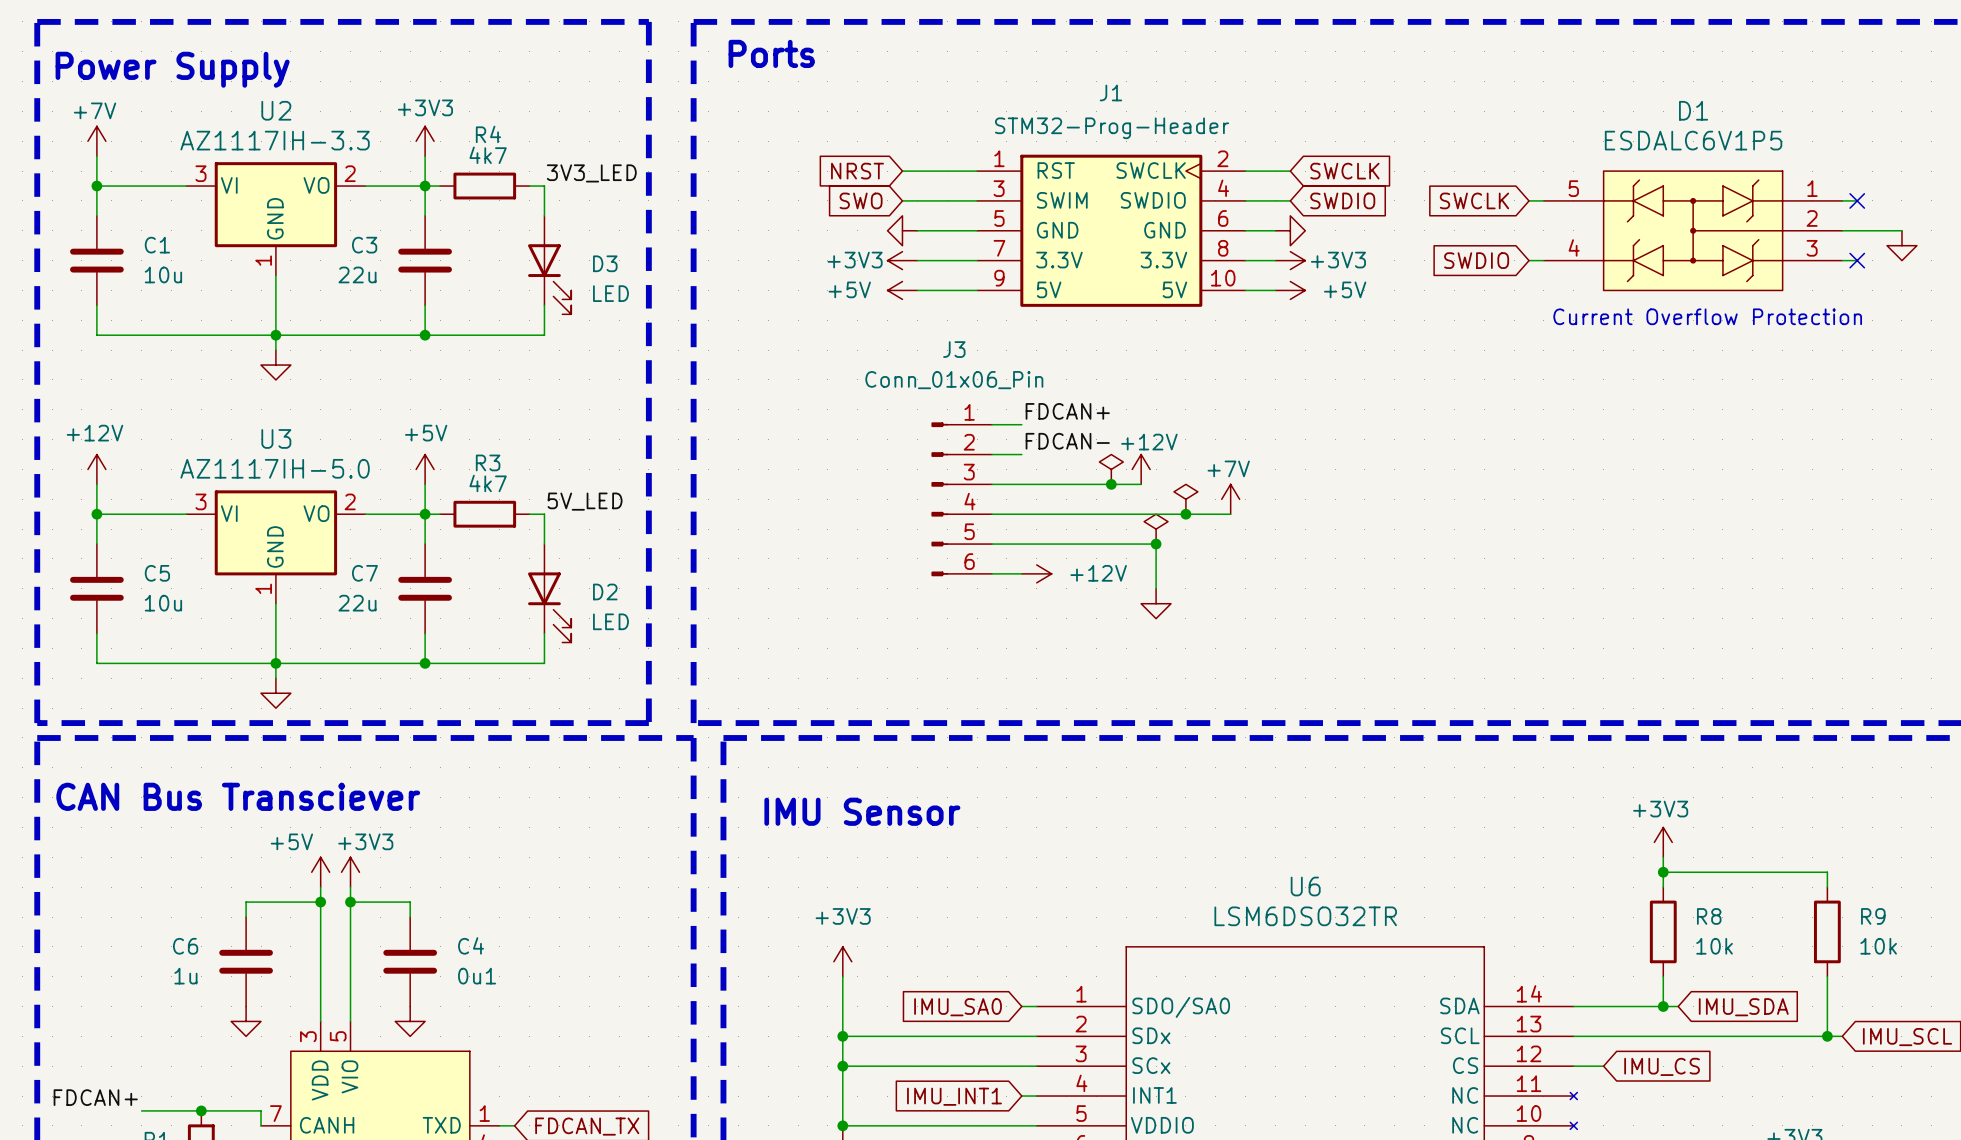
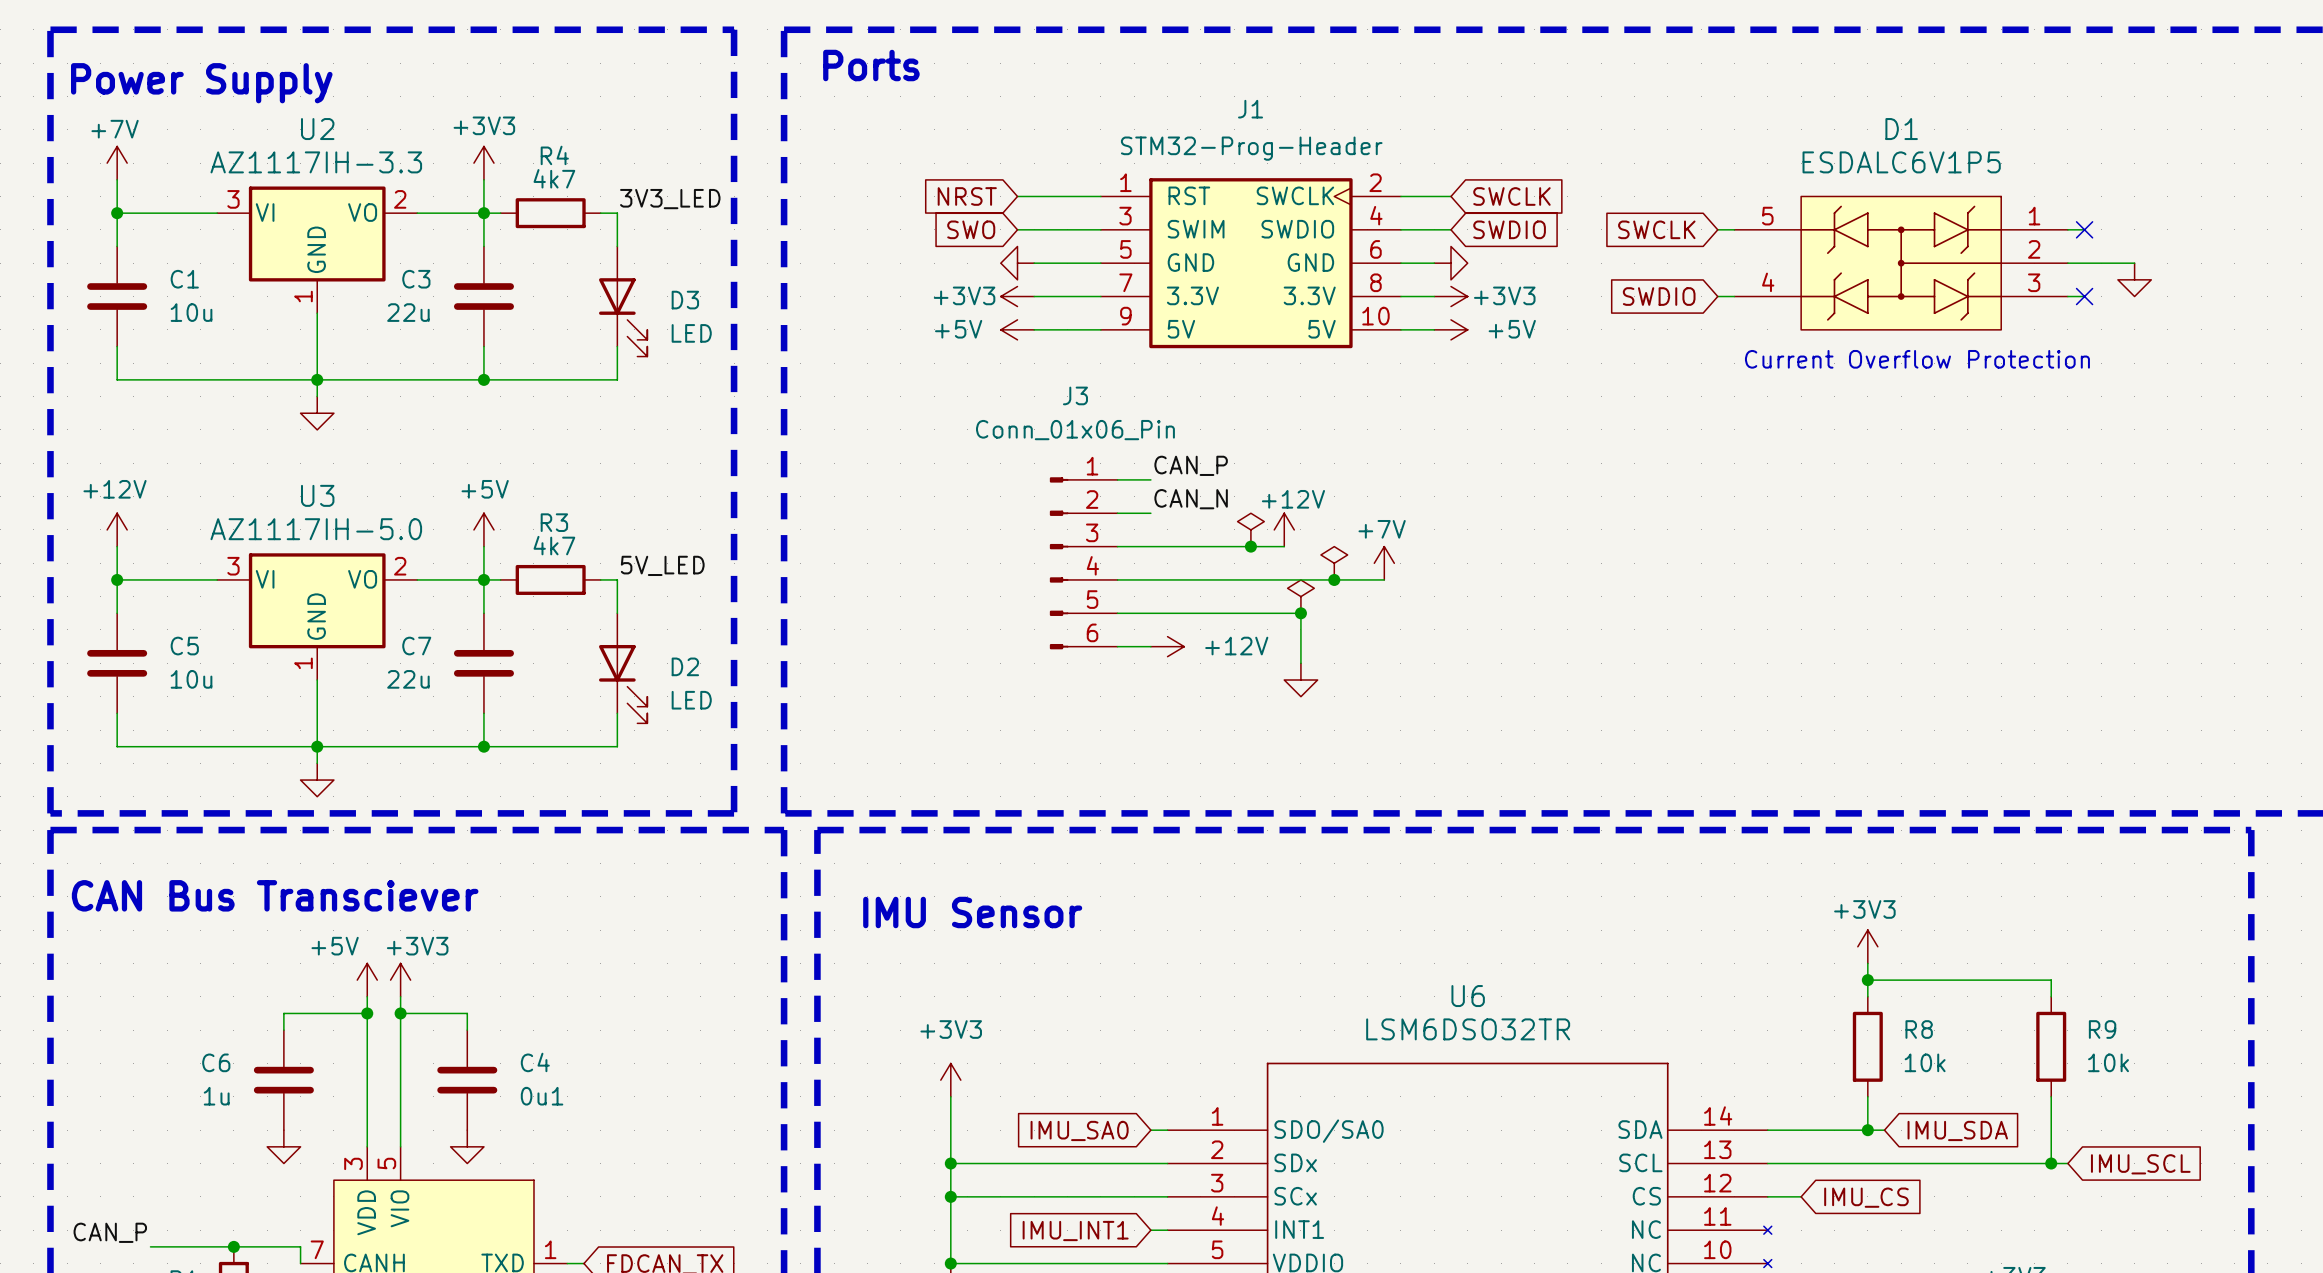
label: FDCAN+ (1067, 411) -> CAN_P (1191, 465)
label: FDCAN- (1067, 441) -> CAN_N (1191, 499)
label: FDCAN+ (95, 1097) -> none
label: none -> CAN_P (110, 1232)
wire: none -> (150, 1246) (167, 1246)

